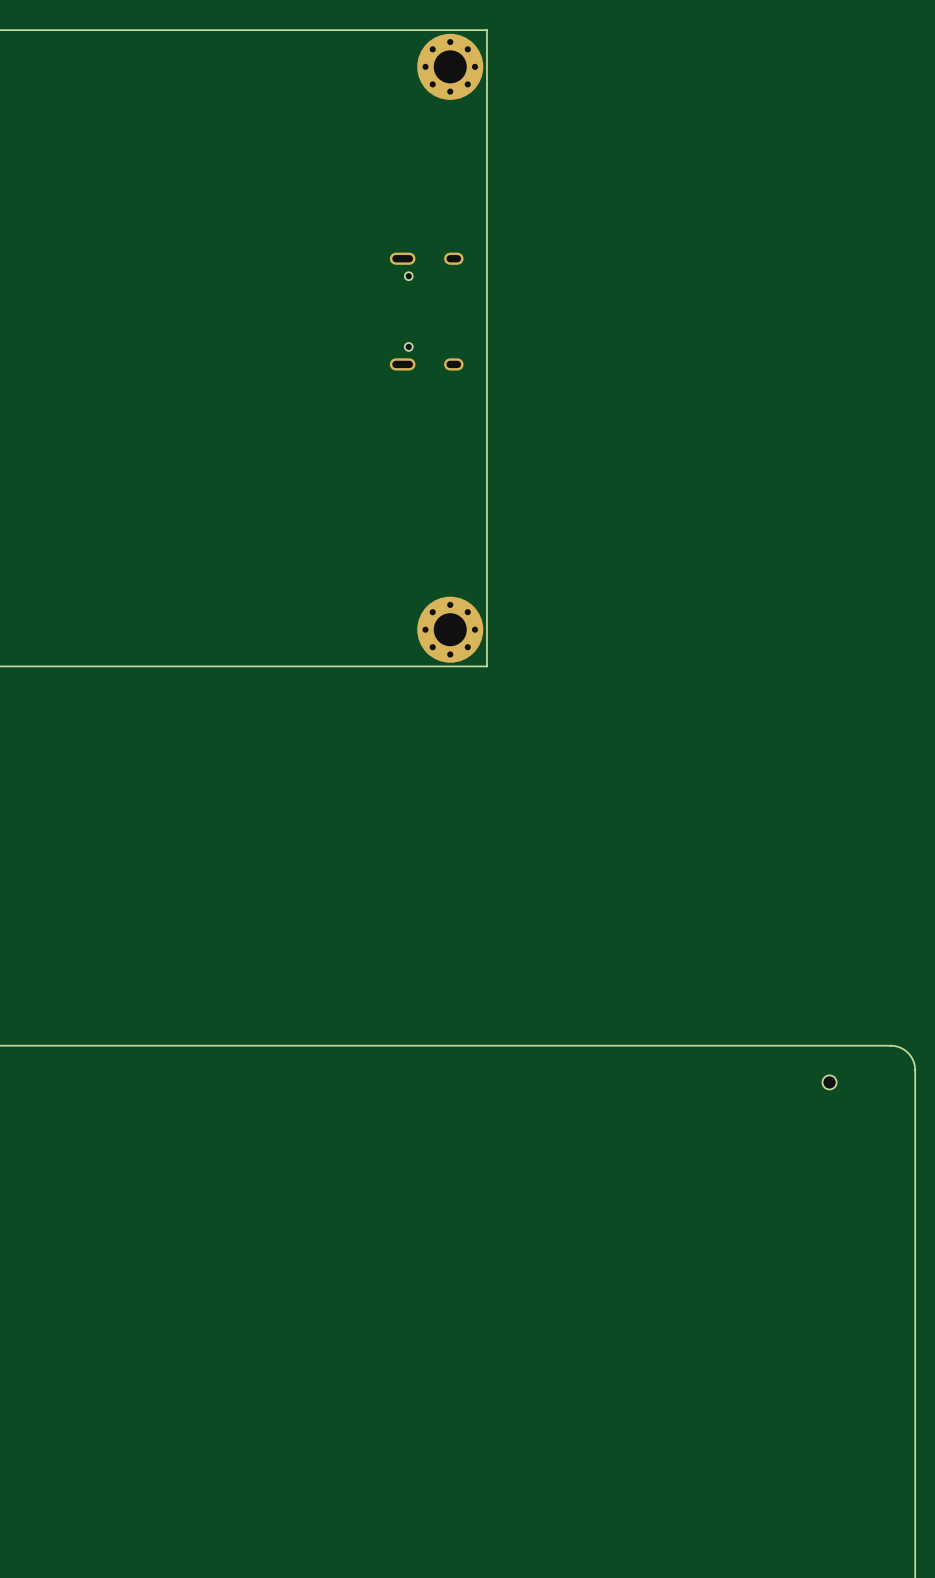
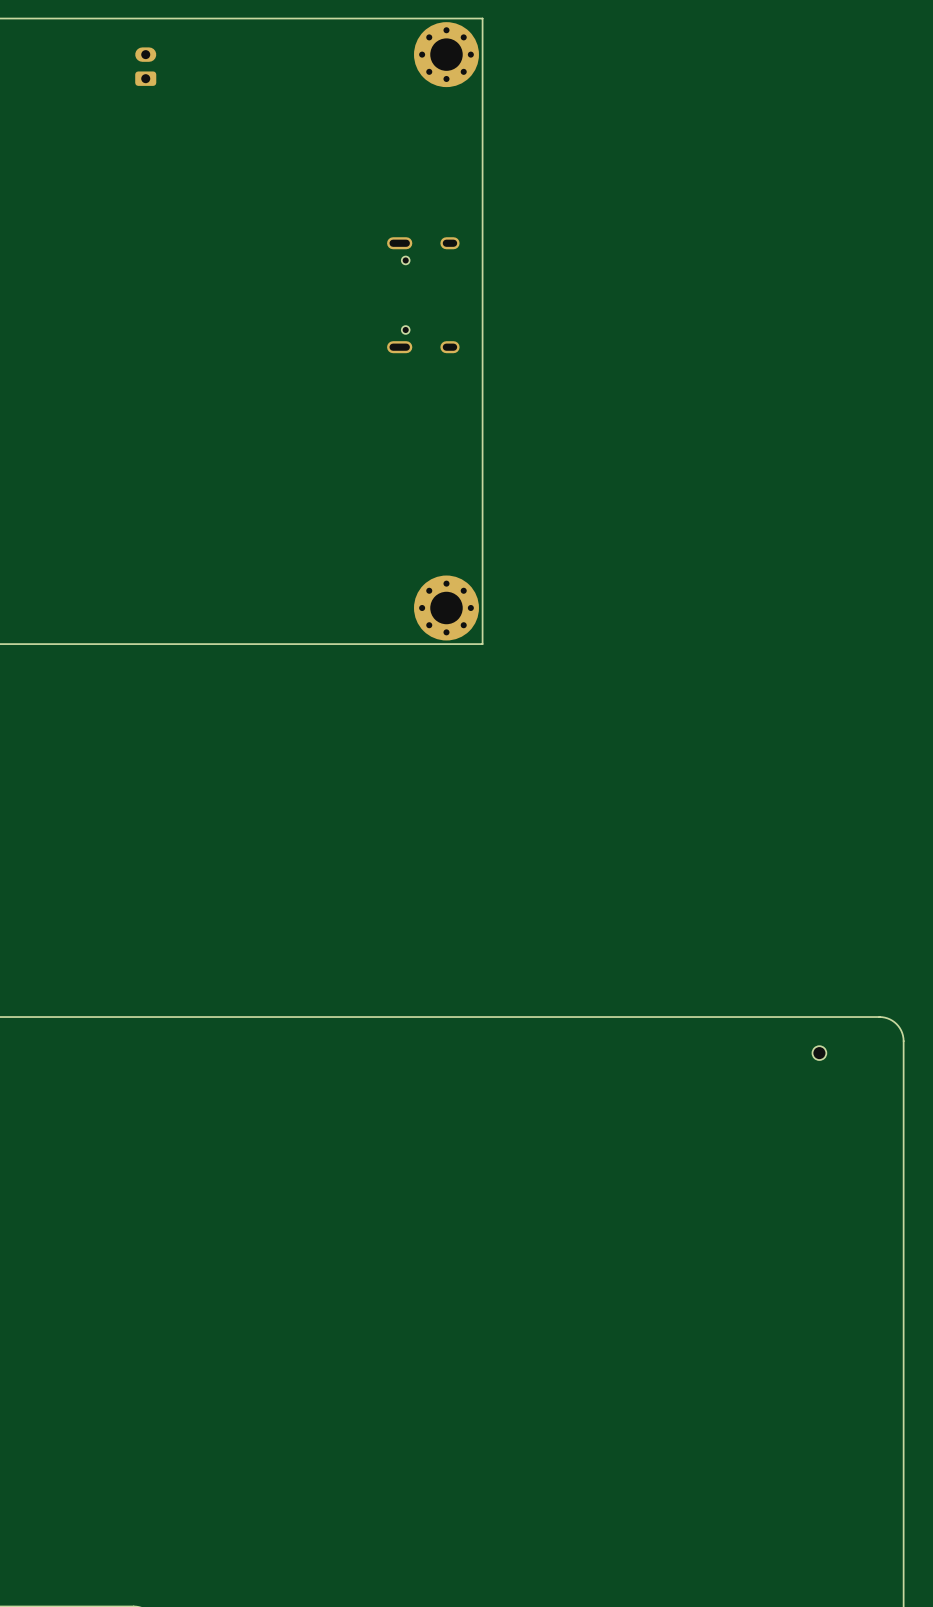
part: none -> (145, 66)

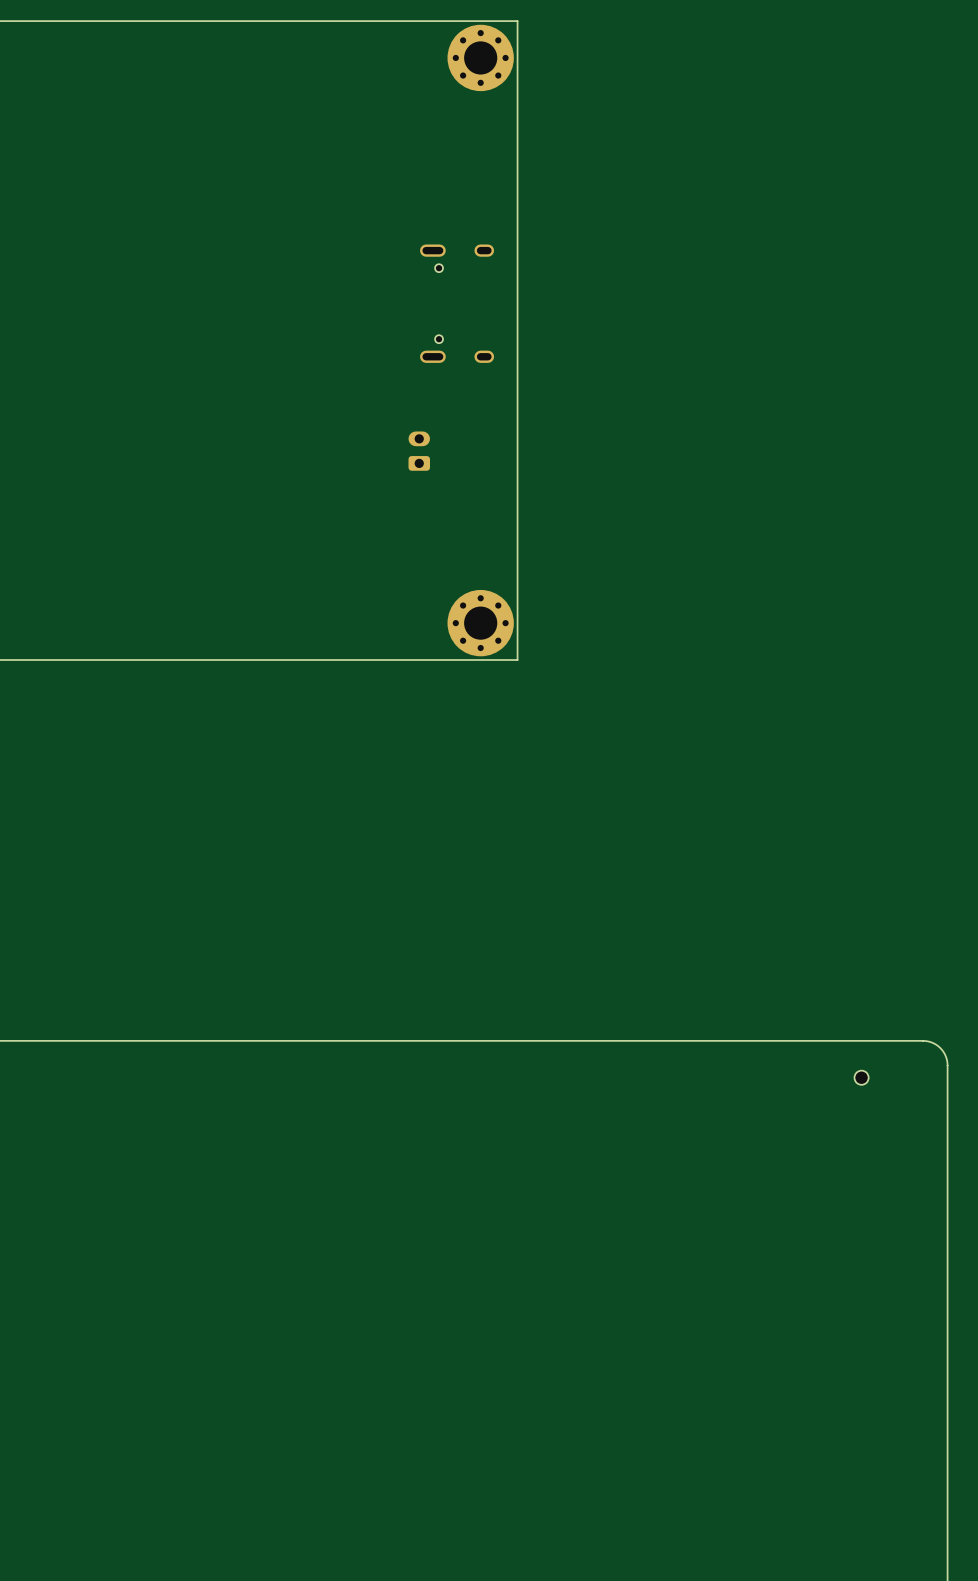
part: (145, 66) -> none
part: none -> (419, 451)

